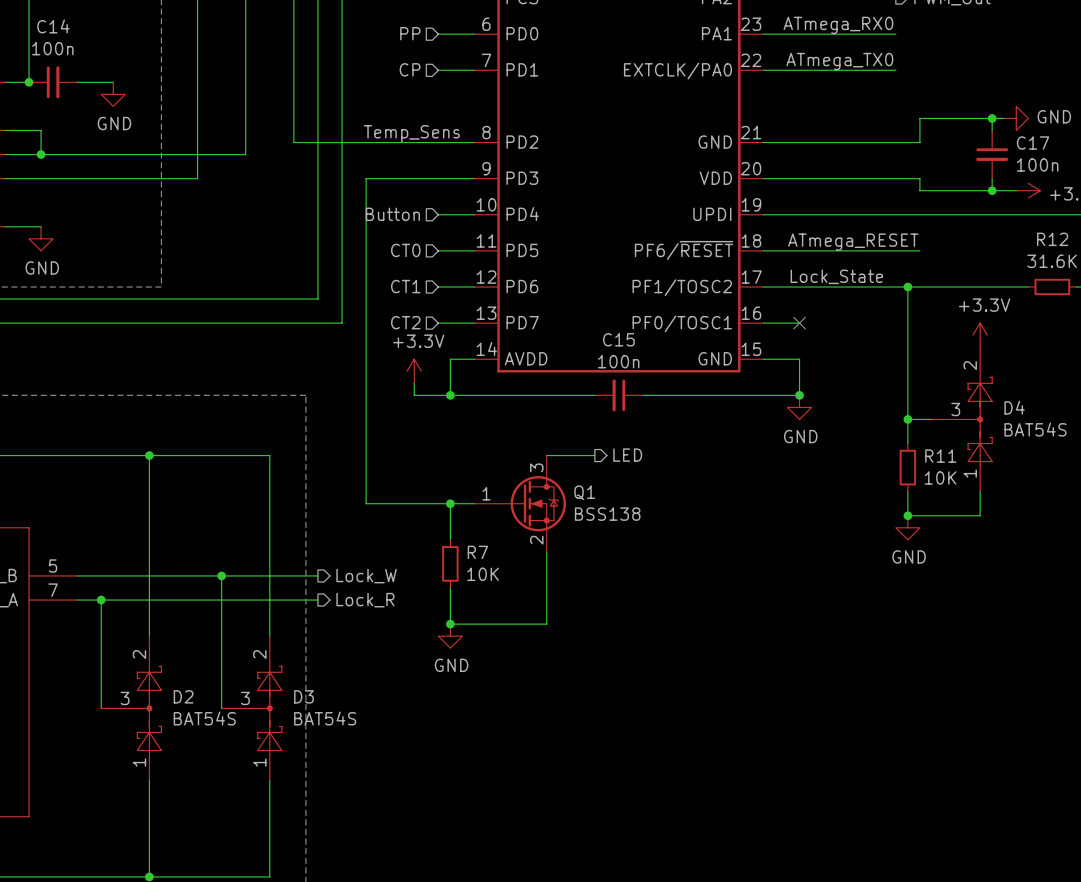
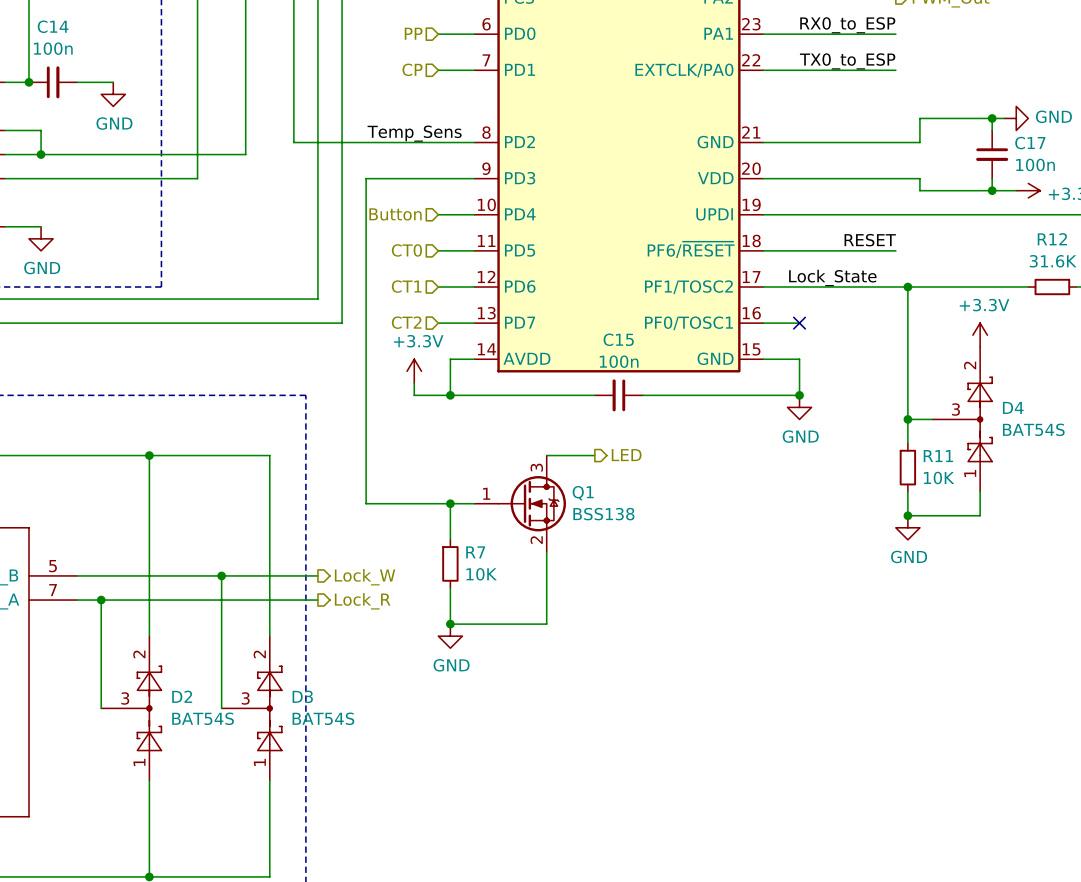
label: ATmega_RX0 (838, 25) -> RX0_to_ESP (847, 25)
label: ATmega_TX0 (839, 61) -> TX0_to_ESP (847, 61)
label: none -> RESET (870, 240)
label: ATmega_RESET (853, 242) -> none
wire: (895, 250) (919, 250) -> none

